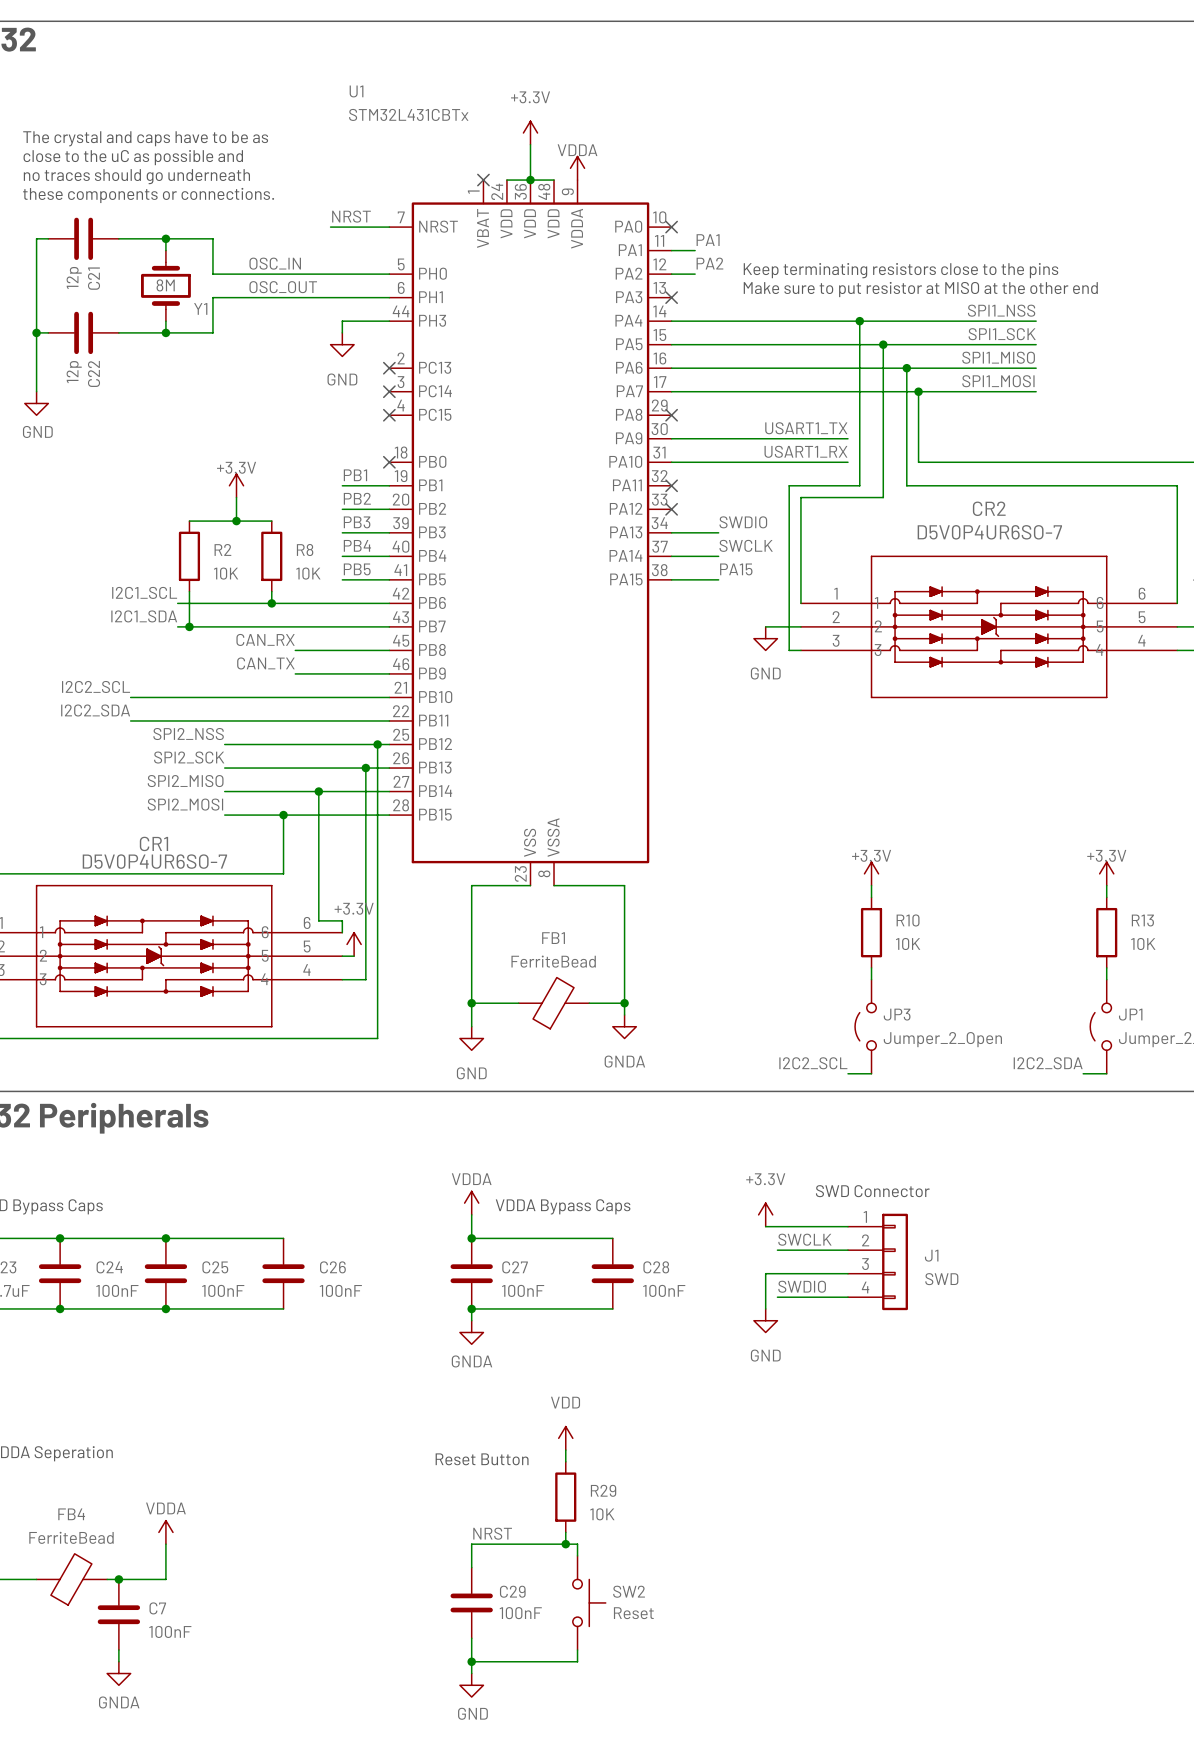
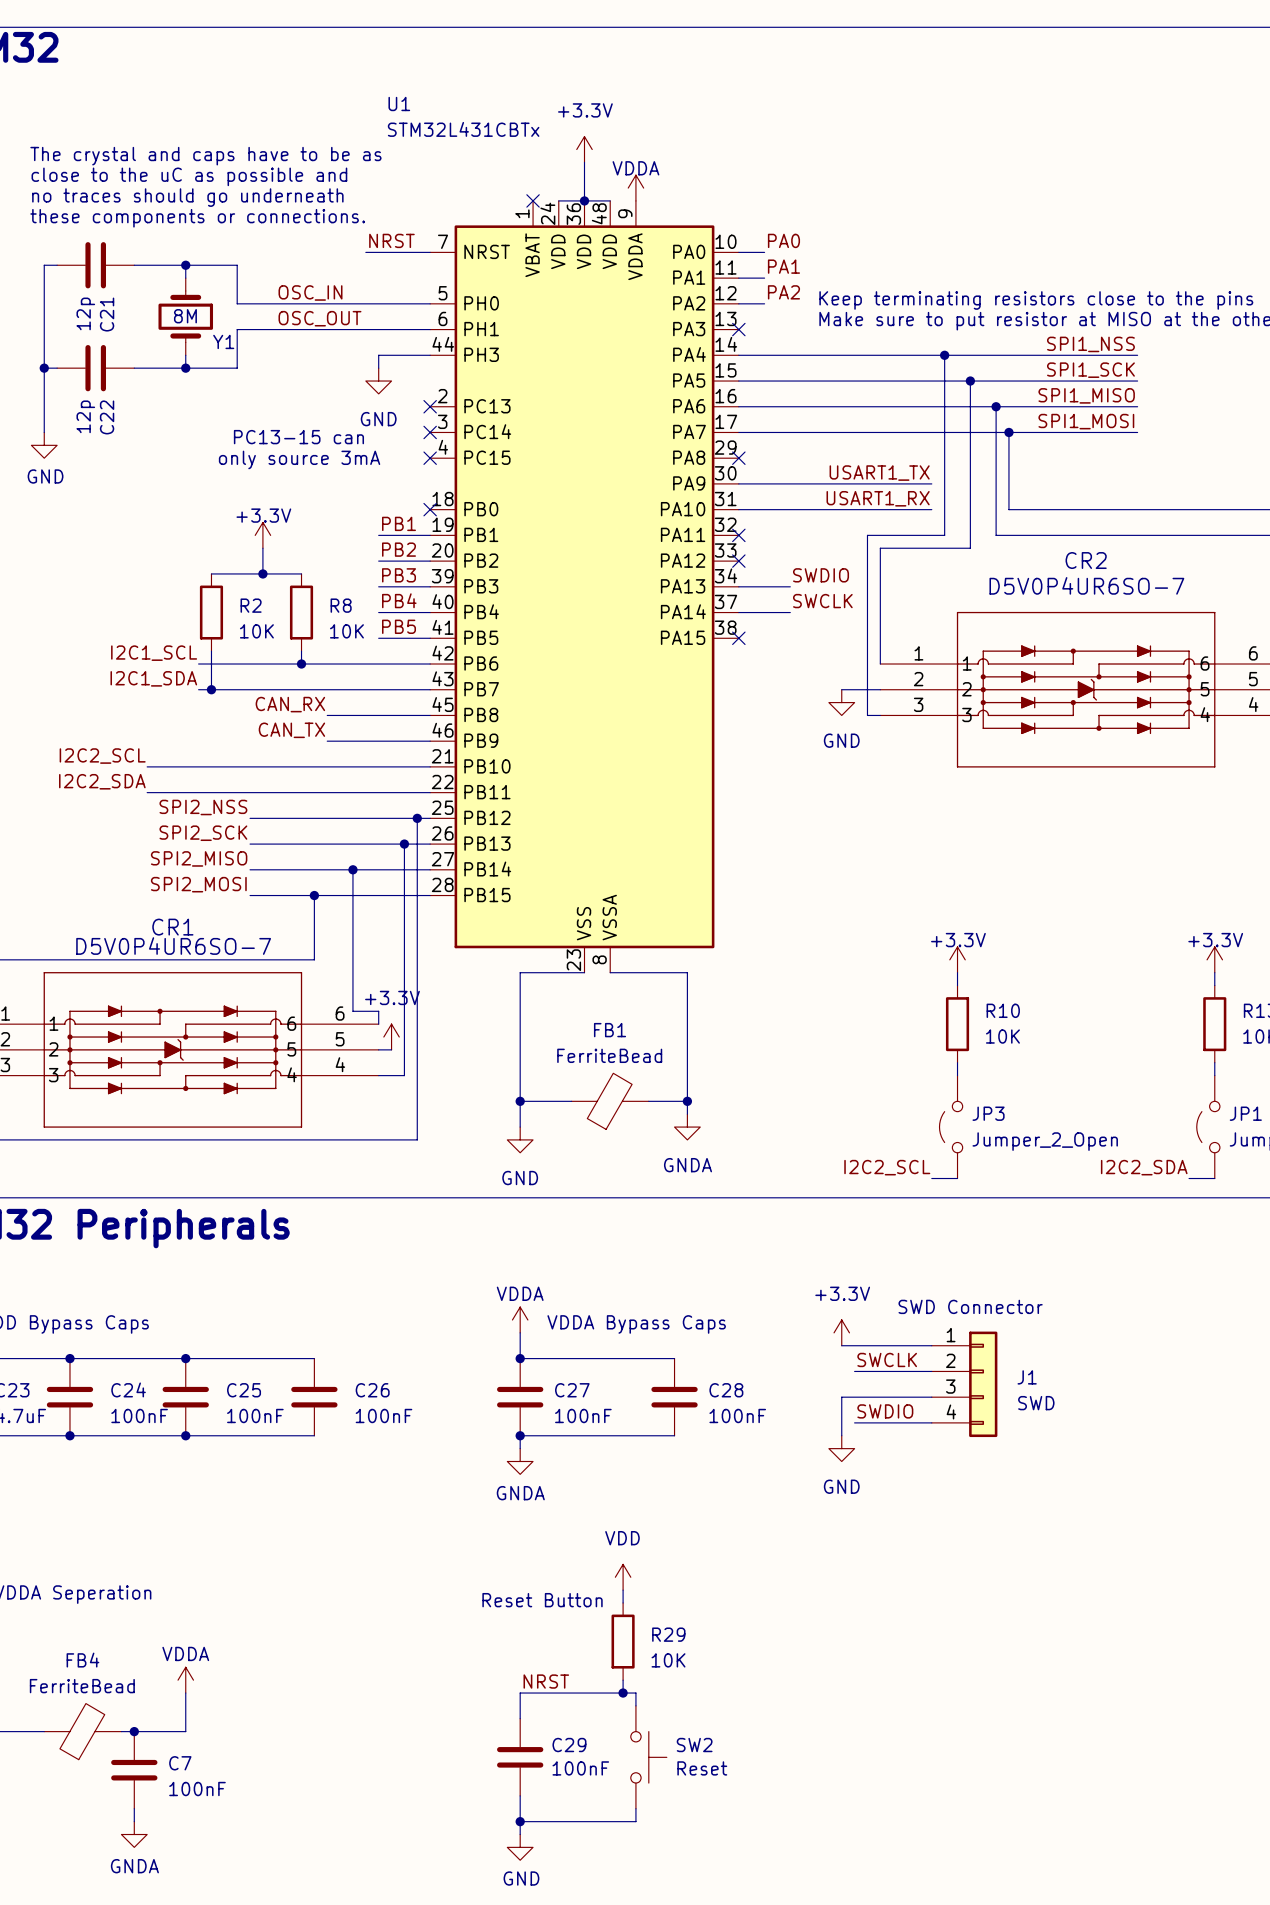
label: none -> PA0 (783, 240)
wire: none -> (738, 252) (764, 252)
no-connect mark: (671, 227) -> none
text: none -> PC13-15 can (298, 437)
text: none -> only source 3mA (299, 459)
label: PA15 (736, 569) -> none
wire: (671, 579) (718, 579) -> none
no-connect mark: none -> (738, 638)

